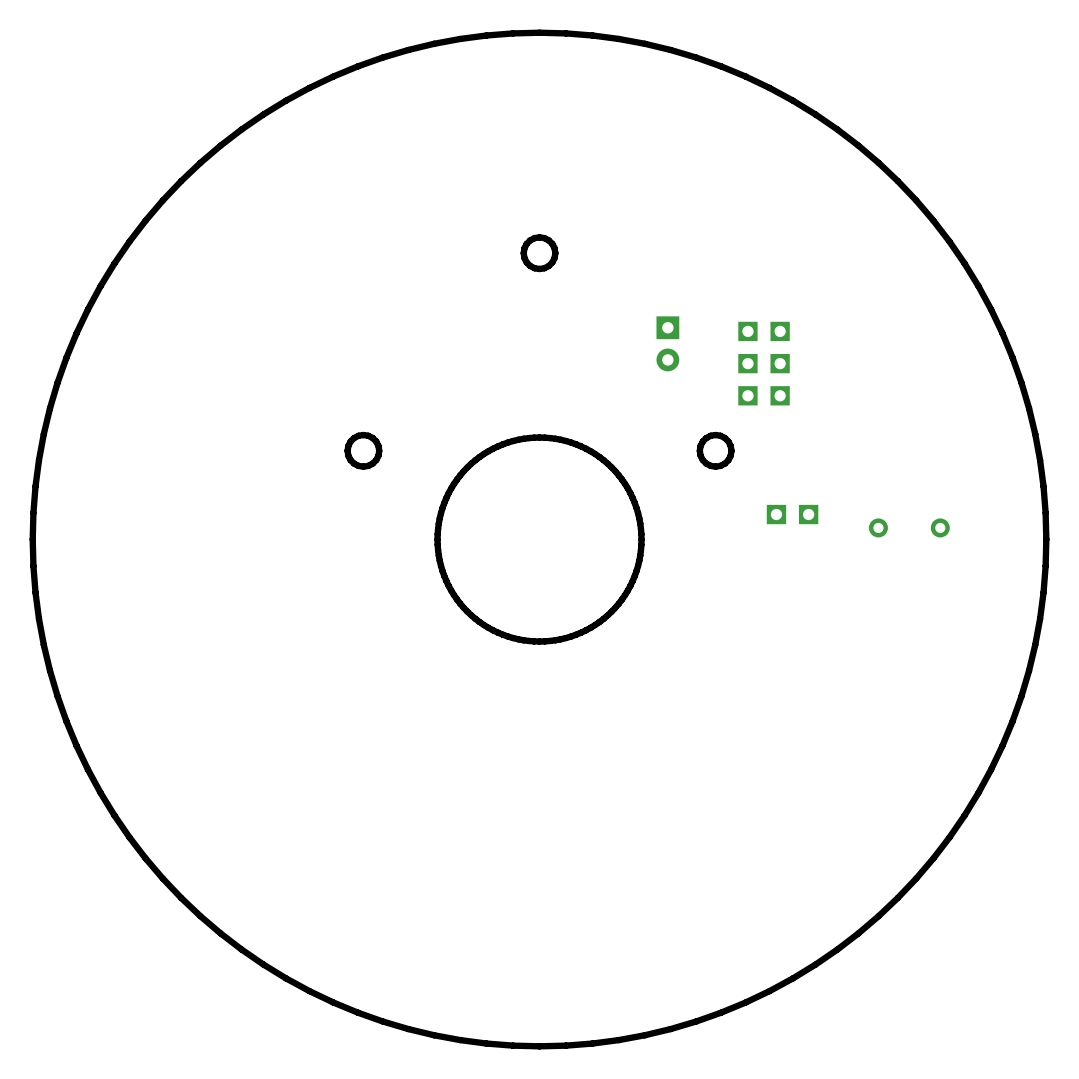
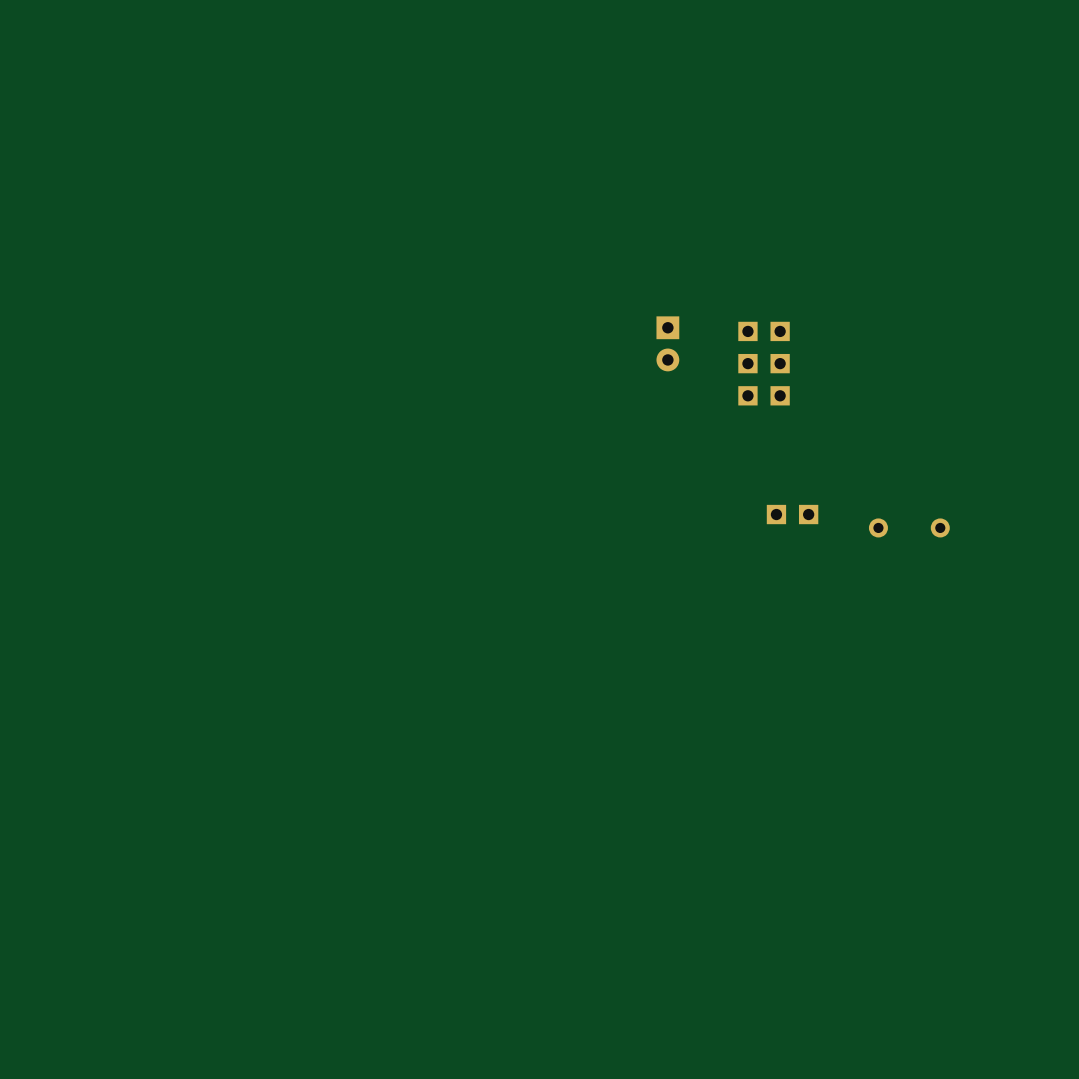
board edge: (539, 32) (486, 35) (434, 43) (382, 57) (333, 76) (286, 100) (241, 129) (181, 181) (129, 241) (100, 286) (76, 333) (57, 382) (43, 434) (35, 486) (32, 539) (35, 592) (43, 644) (57, 696) (76, 745) (100, 792) (129, 837) (181, 897) (241, 949) (286, 978) (333, 1002) (382, 1021) (434, 1035) (486, 1043) (539, 1046) (592, 1043) (644, 1035) (696, 1021) (745, 1002) (792, 978) (837, 949) (897, 897) (949, 837) (978, 792) (1002, 745) (1021, 696) (1035, 644) (1043, 592) (1046, 539) (1043, 486) (1035, 434) (1021, 382) (1002, 333) (978, 286) (949, 241) (897, 181) (837, 129) (792, 100) (745, 76) (696, 57) (644, 43) (592, 35) (539, 32) -> none
board edge: (539, 237) (548, 240) (554, 248) (555, 253) (554, 258) (548, 266) (539, 269) (530, 266) (524, 258) (523, 253) (524, 248) (530, 240) (539, 237) -> none
board edge: (363, 435) (368, 435) (376, 441) (379, 450) (376, 460) (368, 465) (363, 466) (358, 465) (350, 460) (347, 450) (350, 441) (358, 435) (363, 435) -> none
board edge: (715, 435) (720, 435) (728, 441) (731, 450) (728, 460) (720, 465) (715, 466) (710, 465) (702, 460) (699, 450) (702, 441) (710, 435) (715, 435) -> none
board edge: (539, 437) (560, 439) (576, 444) (595, 453) (611, 467) (625, 483) (634, 502) (639, 518) (641, 539) (639, 560) (634, 576) (625, 595) (611, 611) (595, 625) (576, 634) (560, 639) (539, 641) (518, 639) (502, 634) (483, 625) (467, 611) (453, 595) (444, 576) (439, 560) (437, 539) (439, 518) (444, 502) (453, 483) (467, 467) (483, 453) (502, 444) (518, 439) (539, 437) -> none

